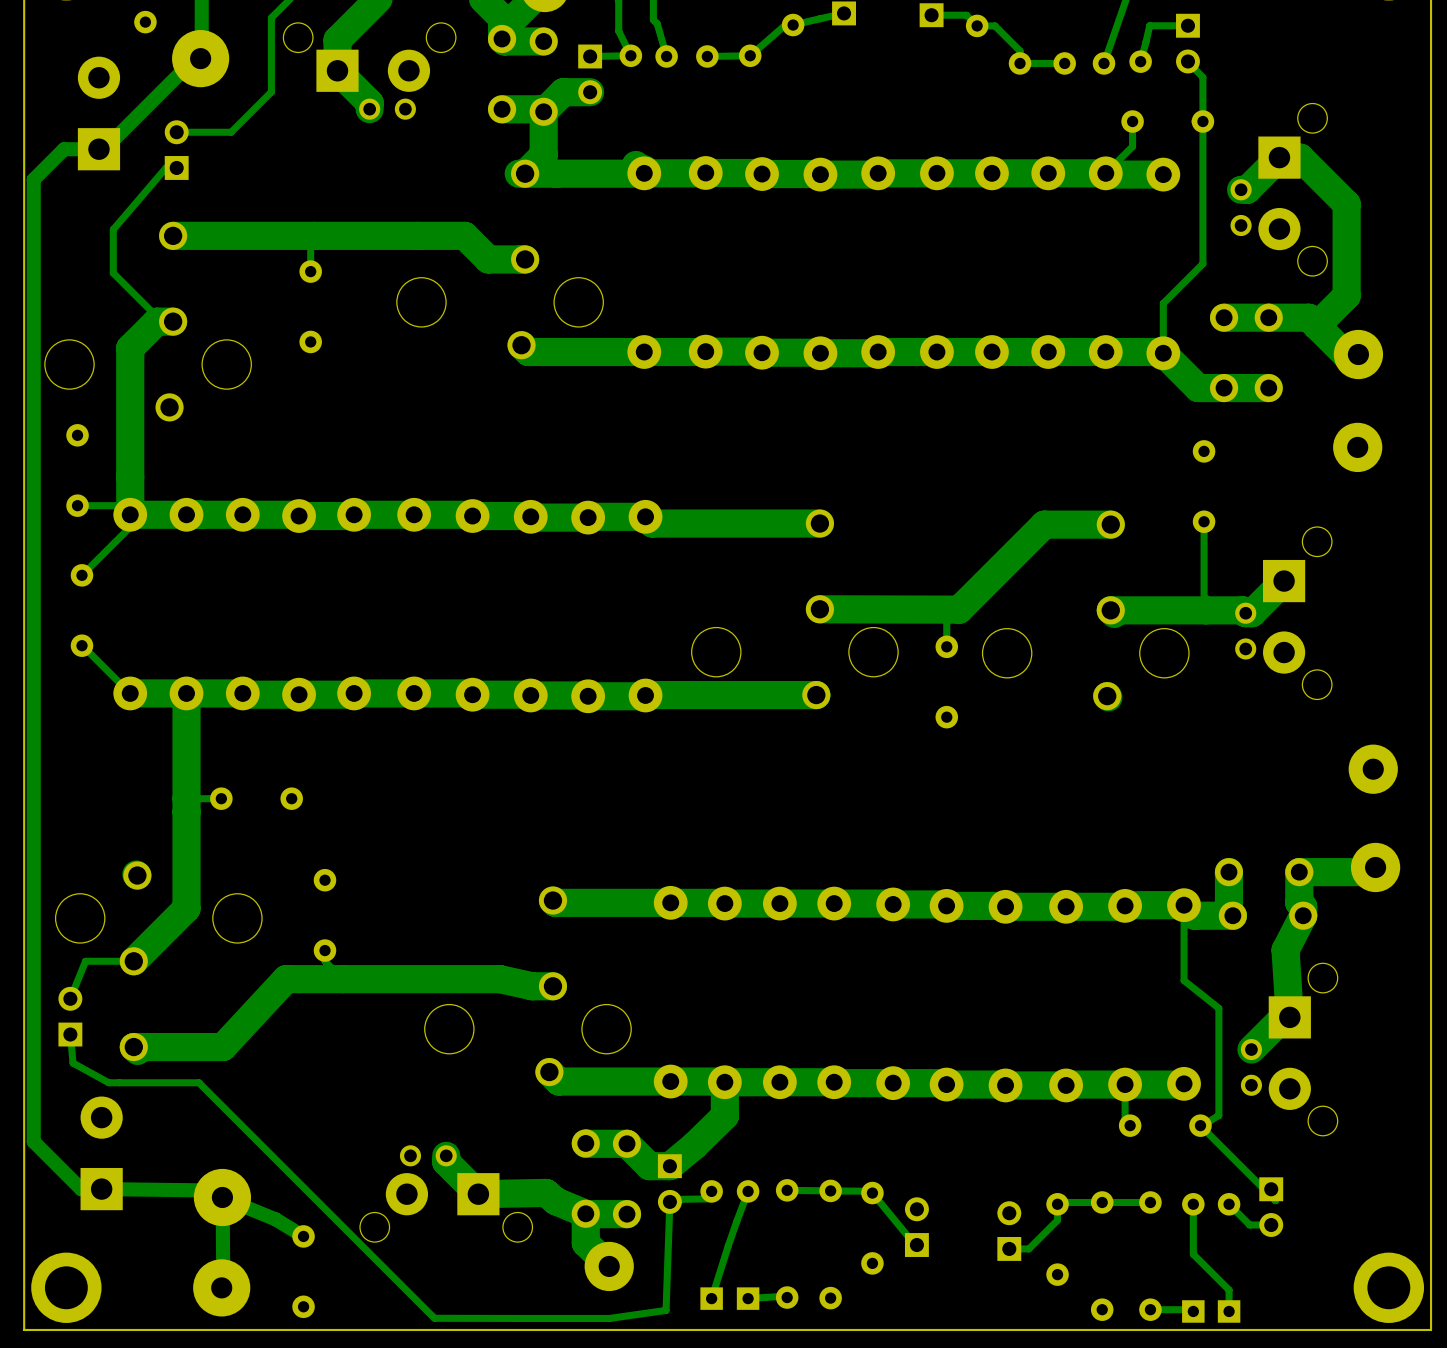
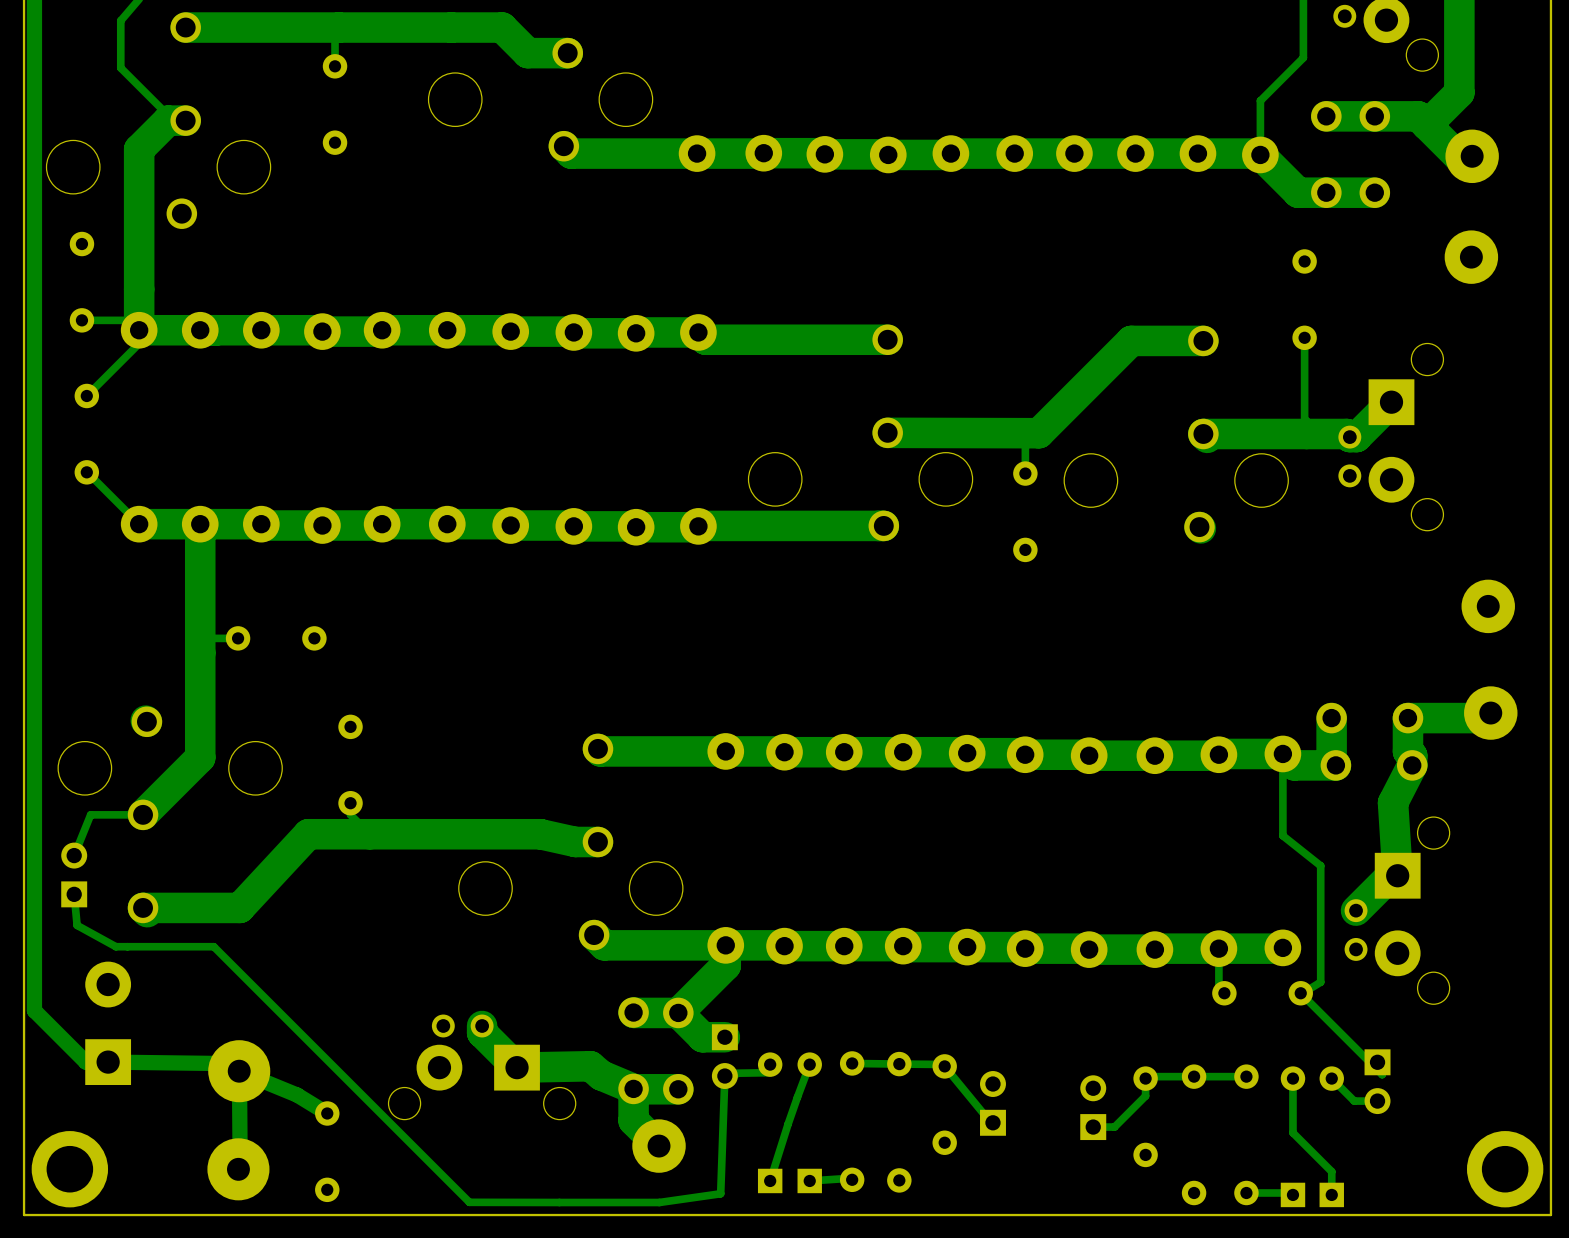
track: none -> (725, 945) (725, 965) (678, 1012)
track: (724, 1082) (724, 1116) (669, 1166) -> none

